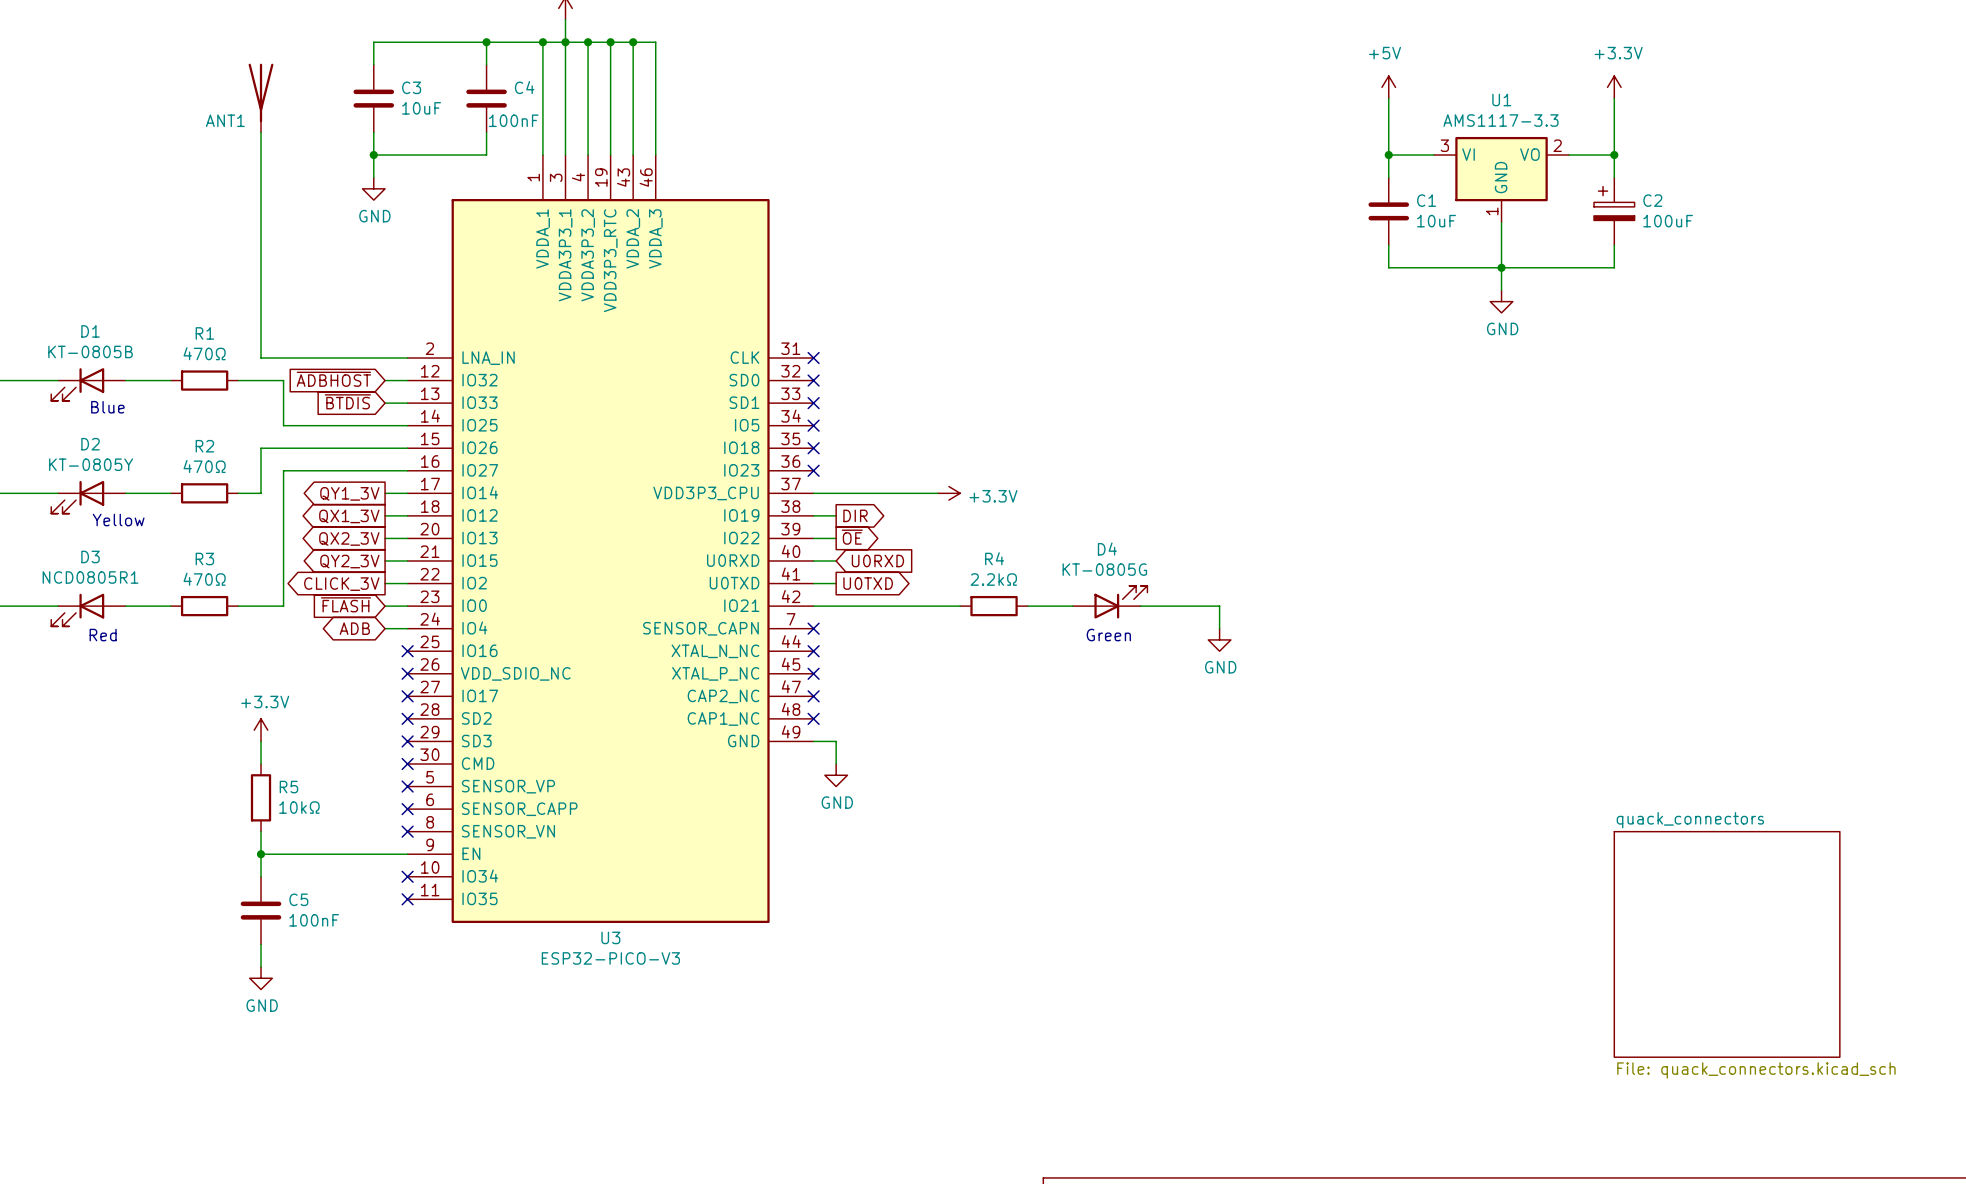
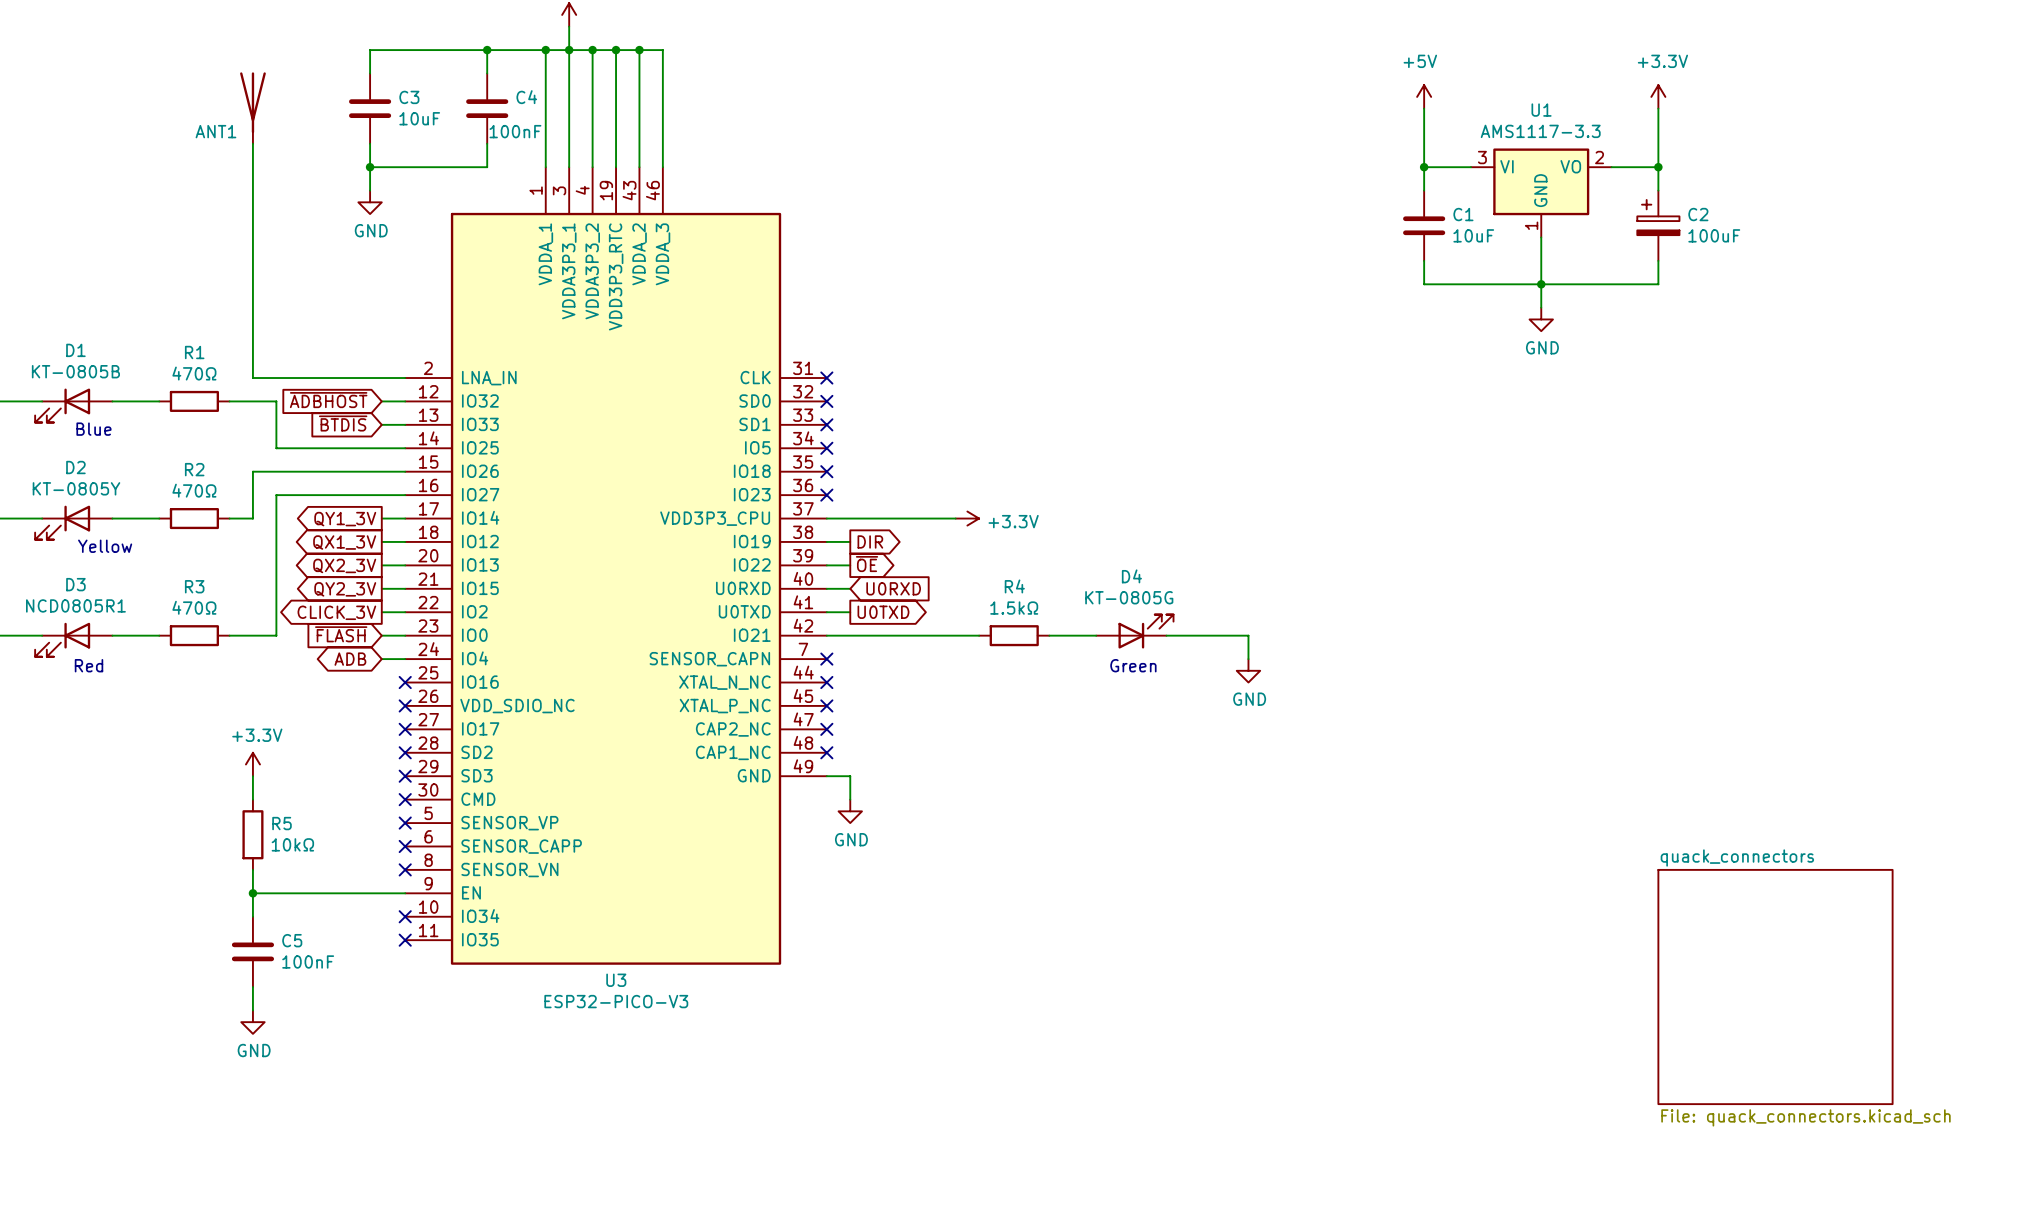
R4 value: 2.2kΩ (993, 579) -> 1.5kΩ (1014, 608)

